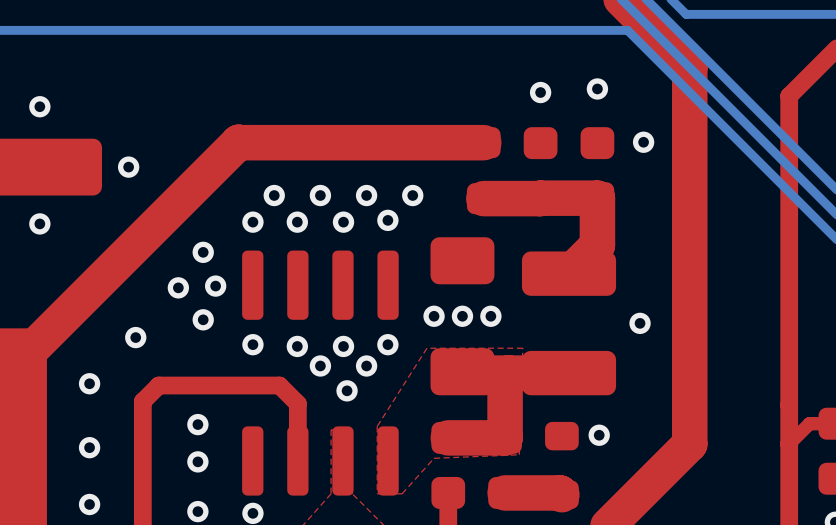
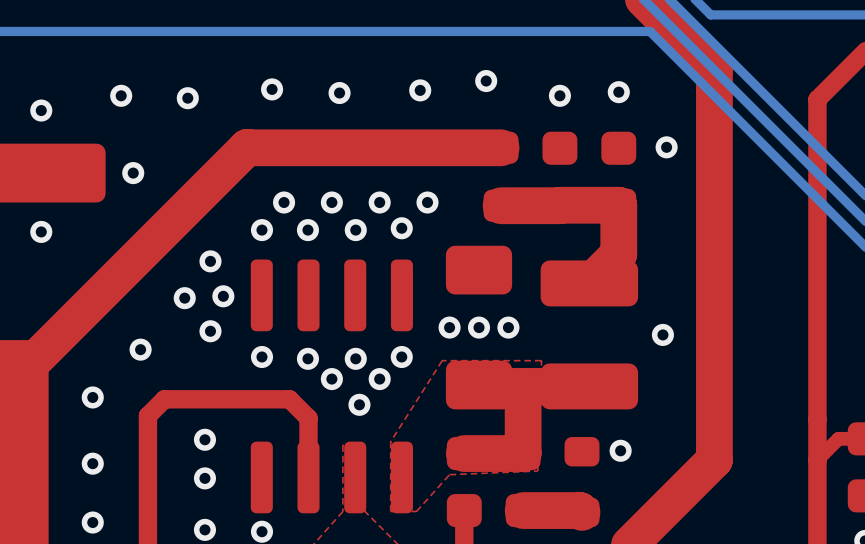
via: none -> (486, 81)
via: none -> (272, 89)
via: none -> (420, 90)
via: none -> (339, 93)
via: none -> (121, 95)
via: none -> (187, 98)

